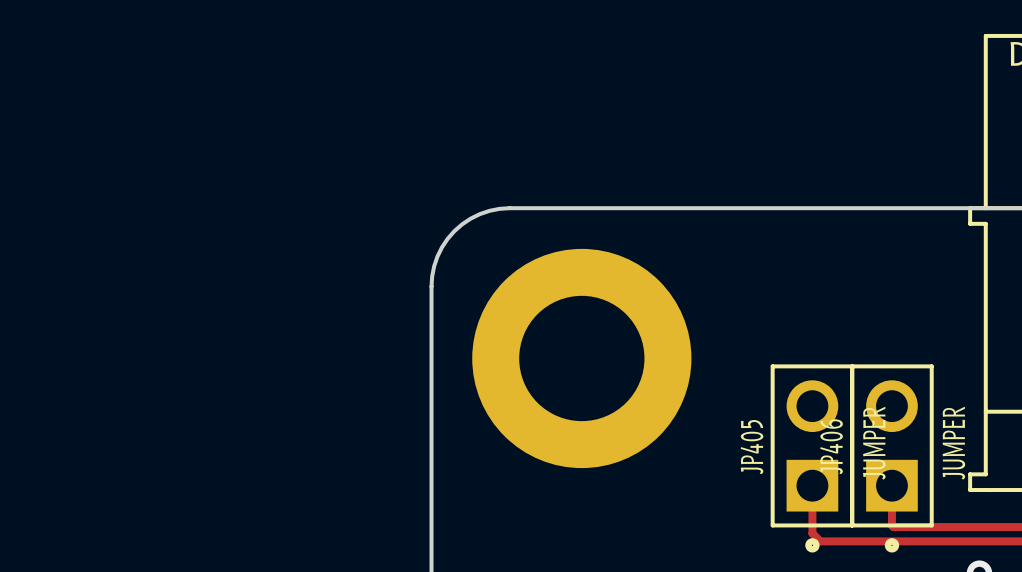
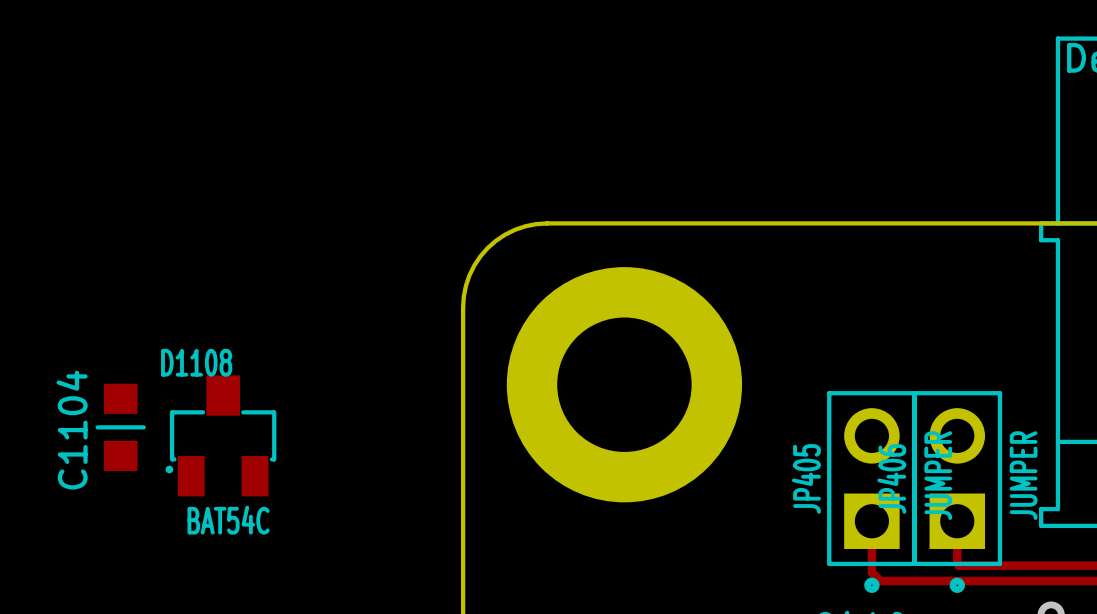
C1104: none -> (120, 427)
D1108: none -> BAT54C (220, 435)

